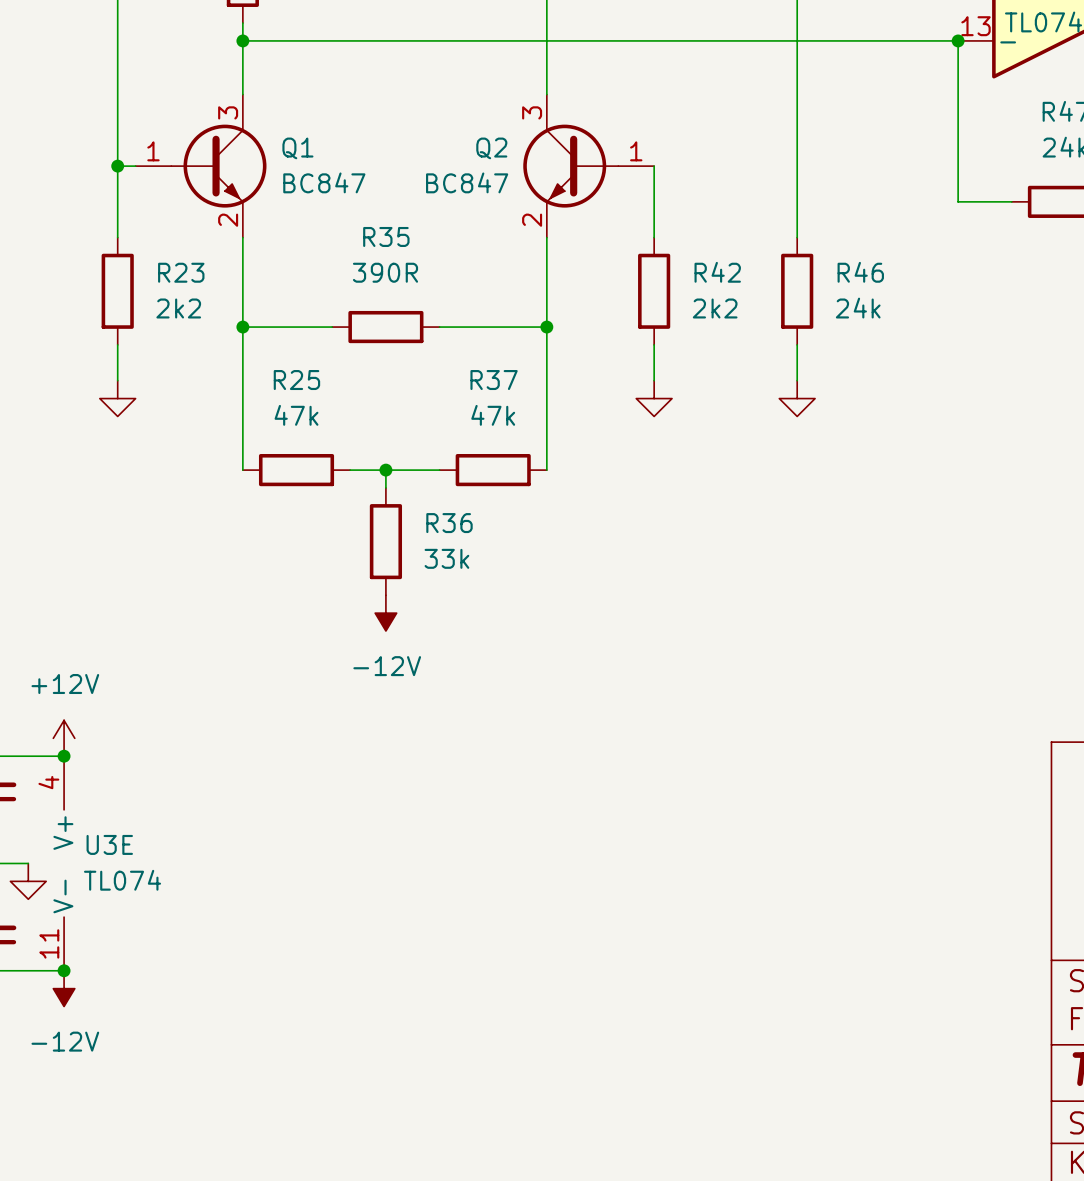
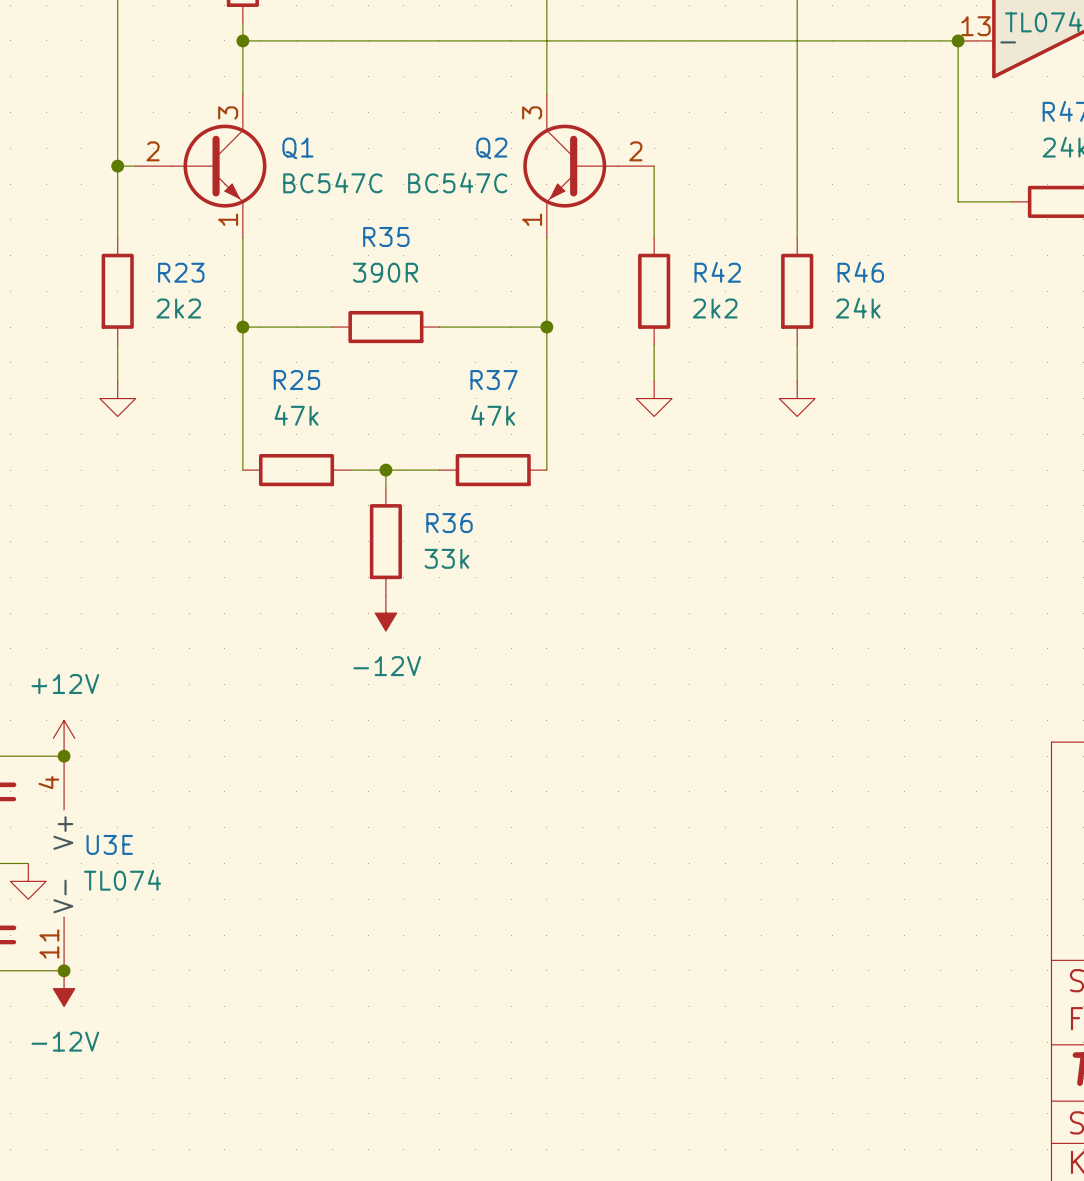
Q1 pin number: 1 (153, 151) -> 2 (153, 151)
Q2 pin number: 1 (636, 151) -> 2 (635, 151)
Q1 value: BC847 (324, 182) -> BC547C (332, 182)
Q2 value: BC847 (467, 182) -> BC547C (457, 182)
Q1 pin number: 2 (228, 220) -> 1 (228, 219)
Q2 pin number: 2 (532, 220) -> 1 (532, 219)

